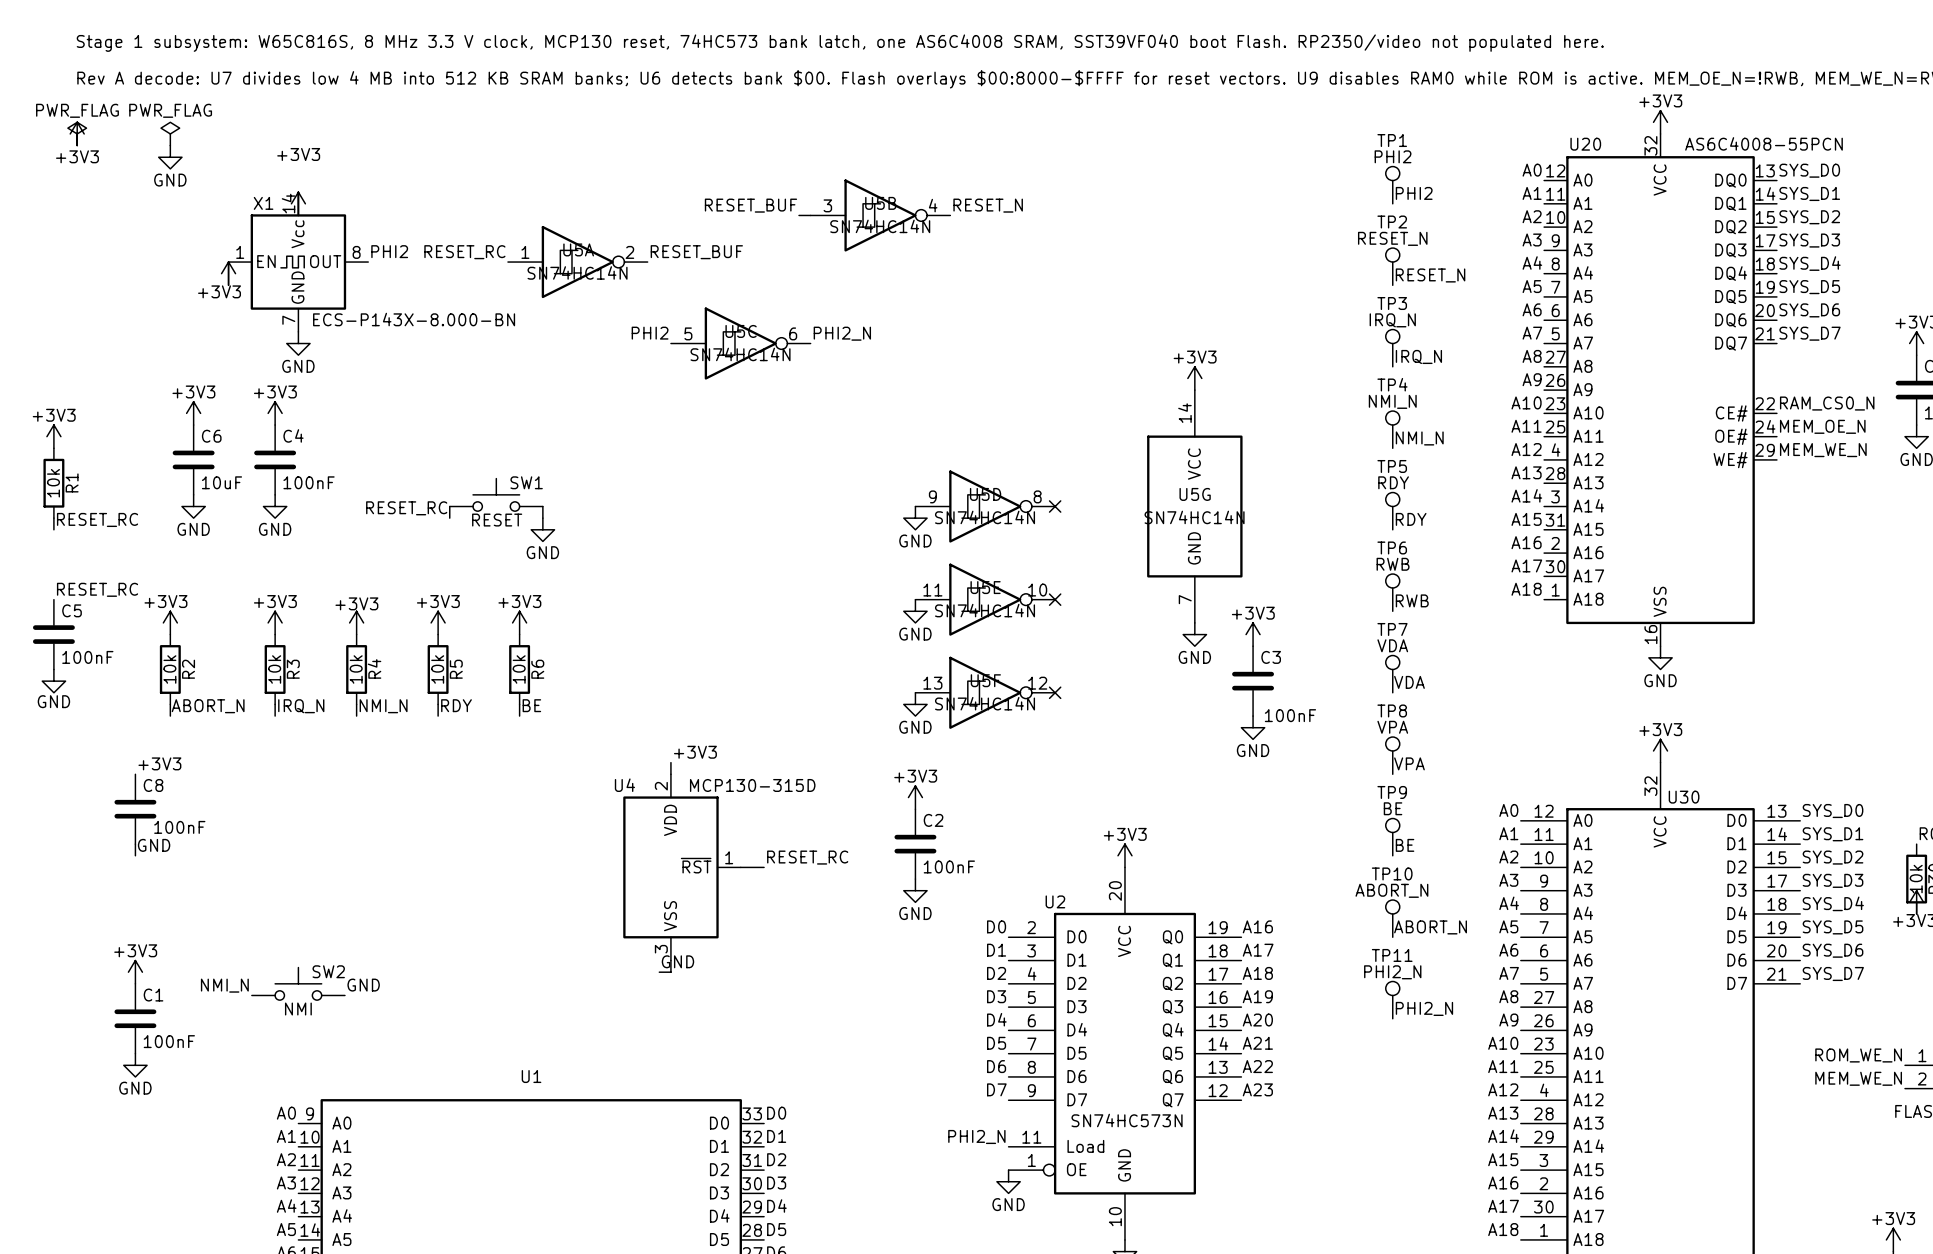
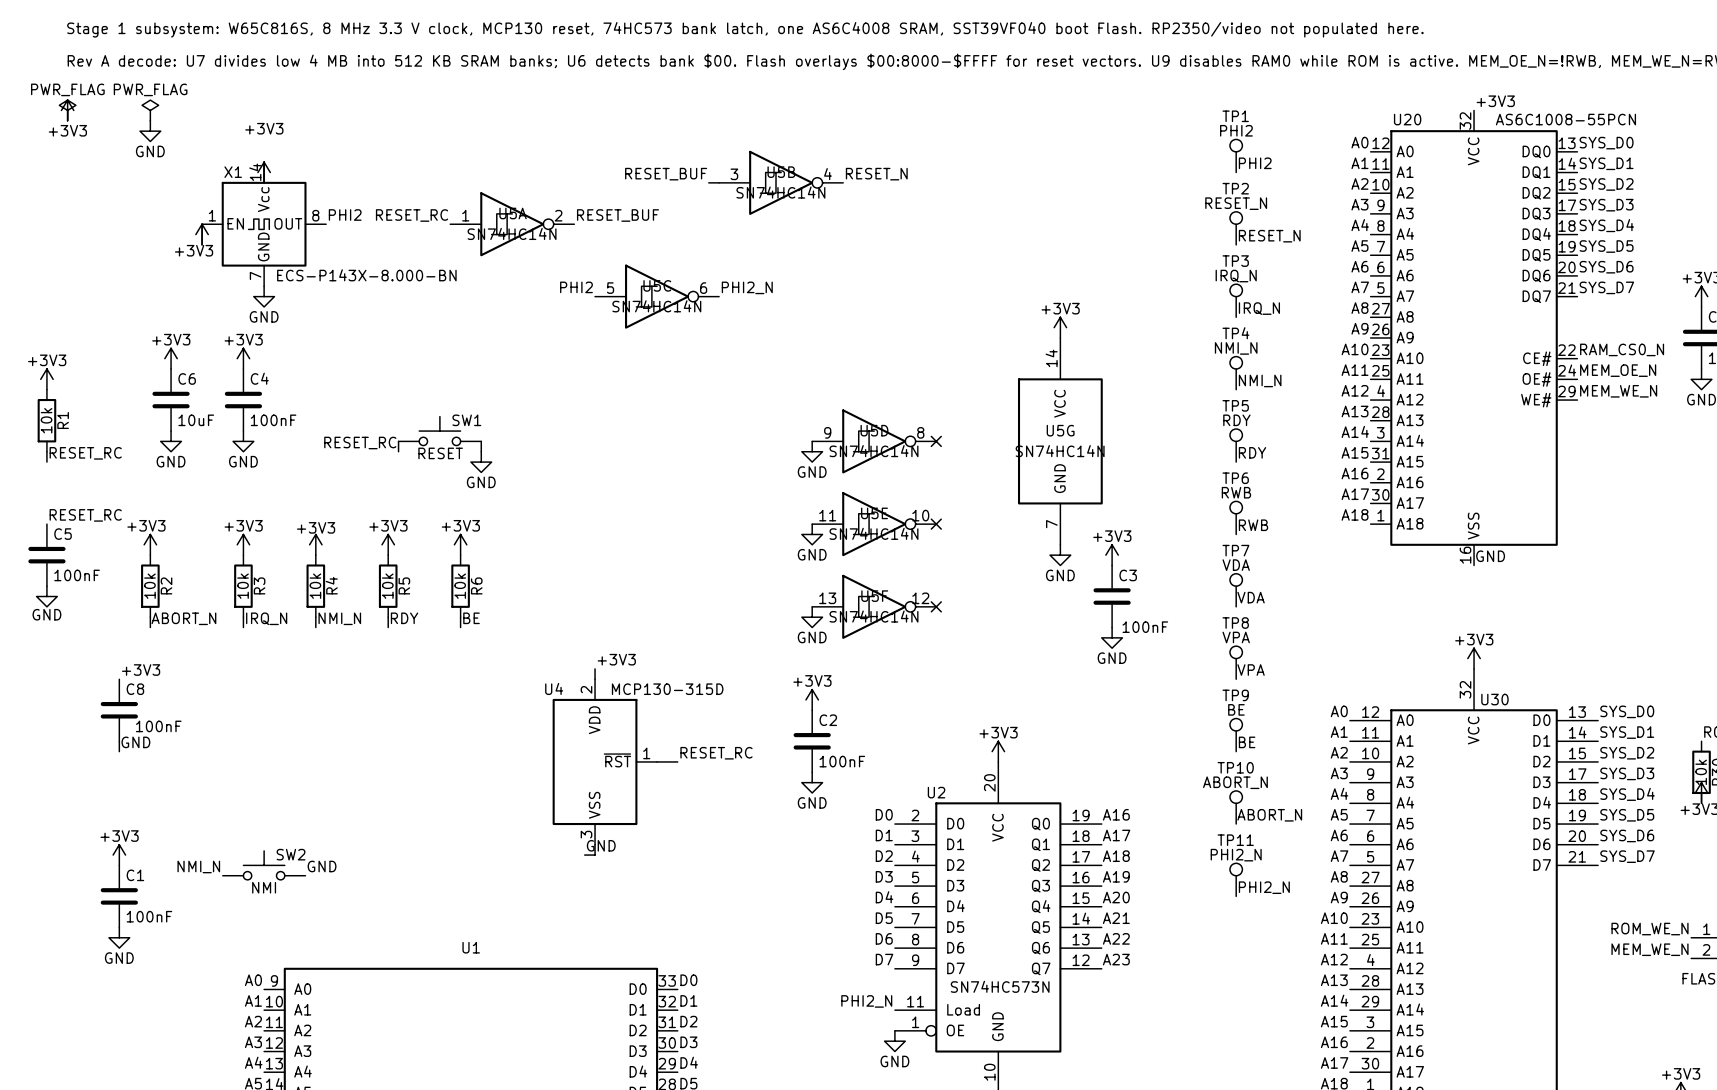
power symbol: +3V3 (1660, 122) -> none
label: none -> +3V3 (1495, 101)
U20 value: AS6C4008-55PCN (1764, 143) -> AS6C1008-55PCN (1565, 119)
label: none -> GND (1490, 556)
power symbol: GND (1660, 657) -> none

